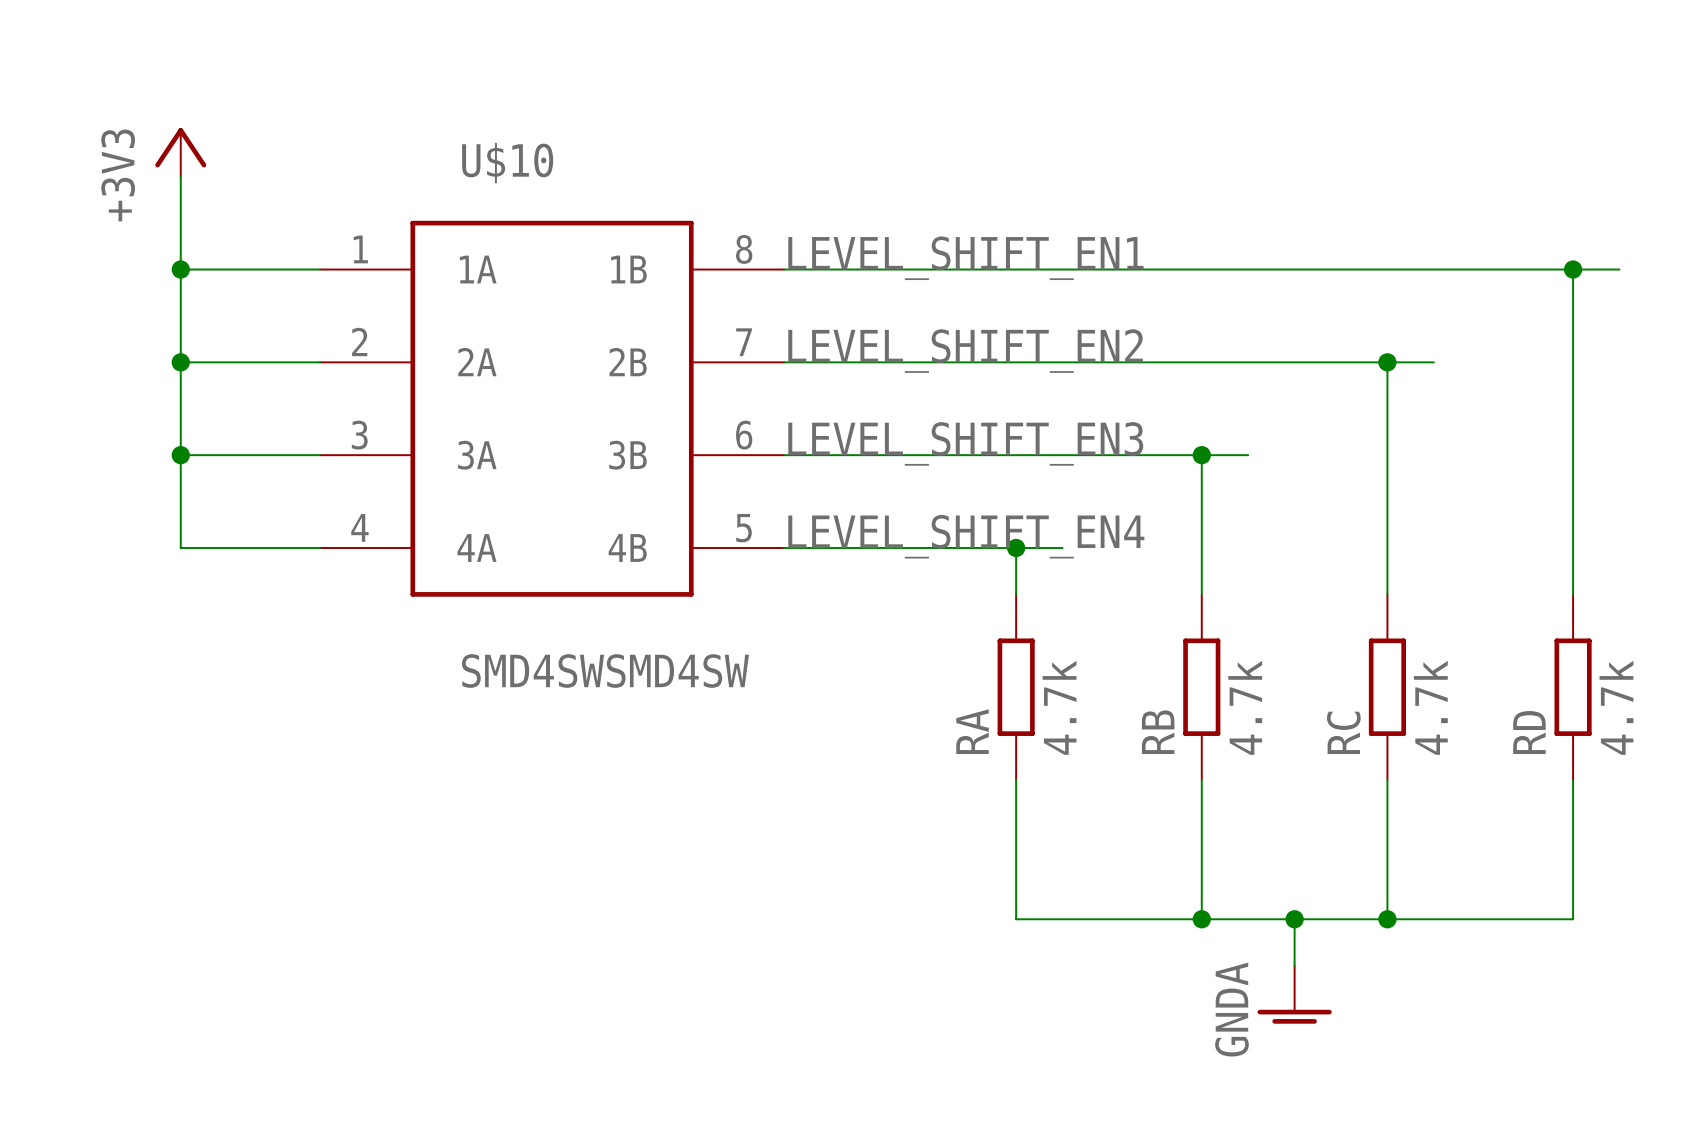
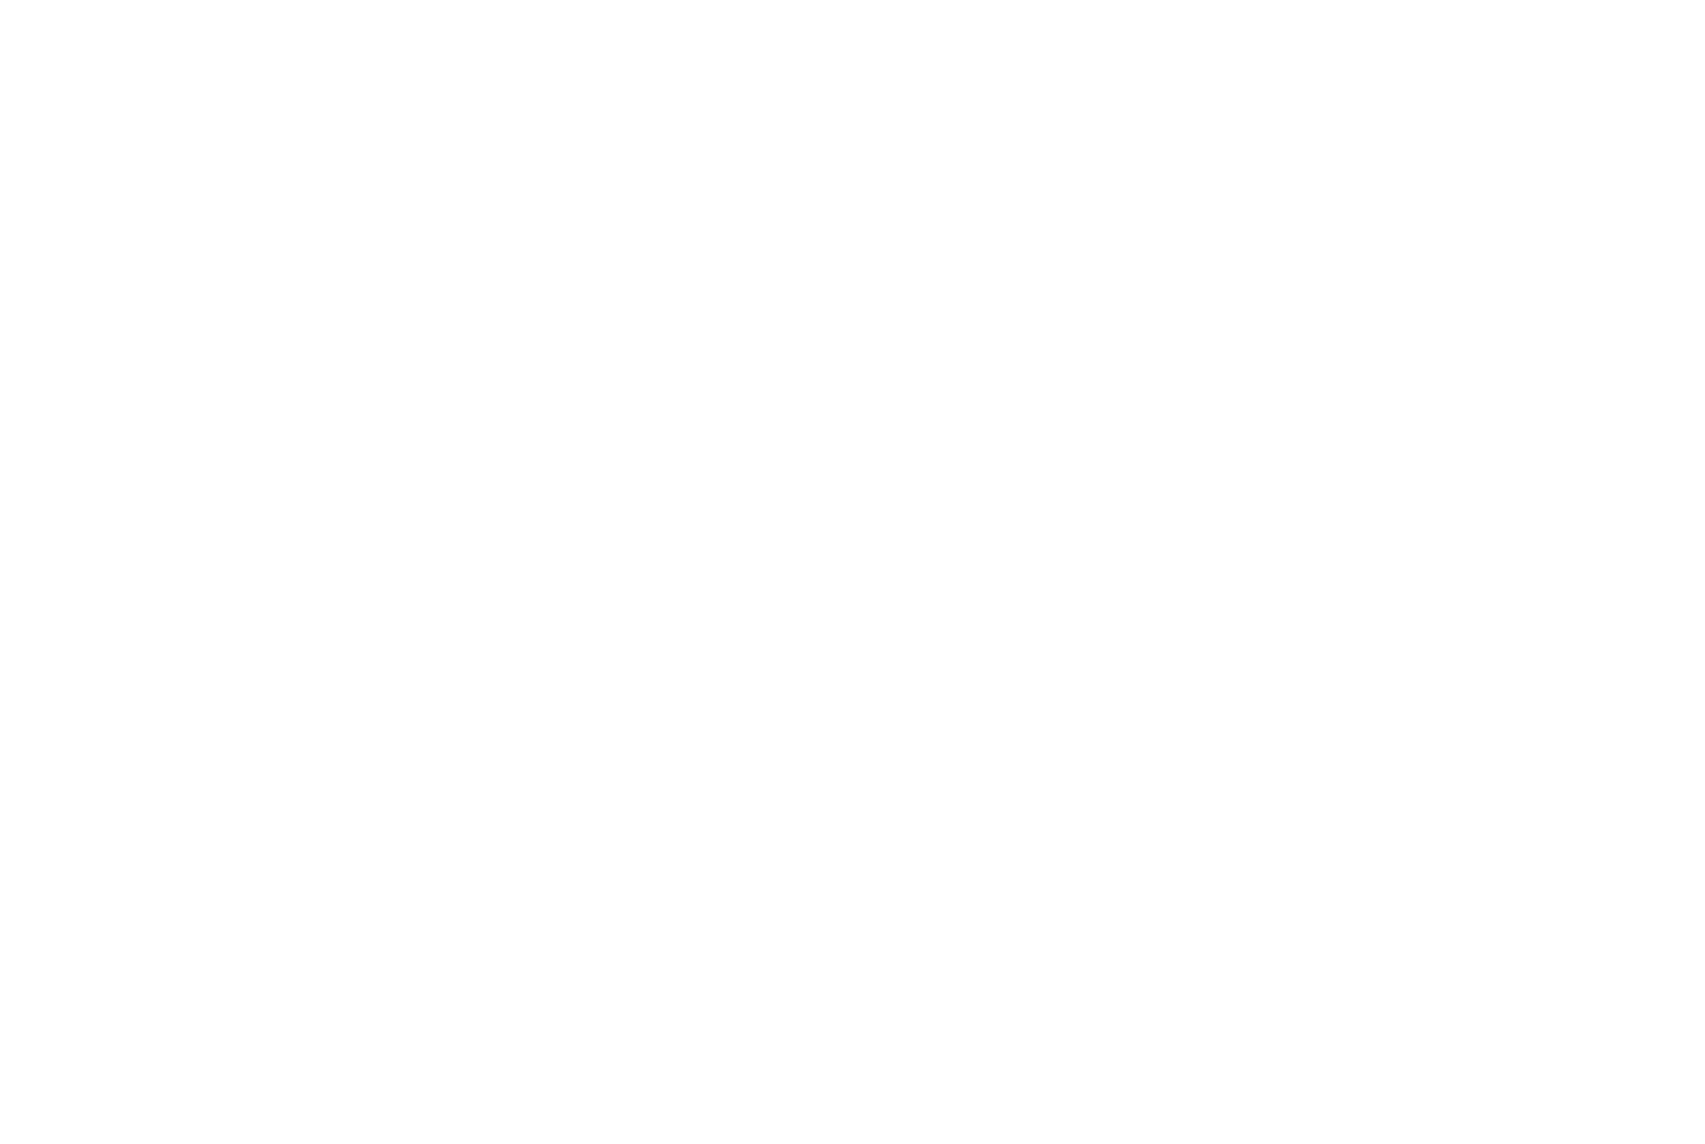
power symbol: +3V3 (180, 152) -> none
wire: (180, 176) (180, 547) (319, 547) -> none
label: LEVEL_SHIFT_EN1 (965, 258) -> none
wire: (180, 269) (319, 269) -> none
junction: (180, 269) -> none
wire: (784, 269) (1619, 269) -> none
wire: (1573, 269) (1573, 594) -> none
junction: (1573, 269) -> none
label: LEVEL_SHIFT_EN2 (965, 351) -> none
wire: (180, 362) (319, 362) -> none
junction: (180, 362) -> none
wire: (784, 362) (1433, 362) -> none
wire: (1387, 362) (1387, 594) -> none
junction: (1387, 362) -> none
U$10: SMD4SWSMD4SW (552, 408) -> none
label: LEVEL_SHIFT_EN3 (965, 443) -> none
wire: (180, 455) (319, 455) -> none
junction: (180, 455) -> none
wire: (784, 455) (1248, 455) -> none
wire: (1201, 455) (1201, 594) -> none
junction: (1201, 455) -> none
label: LEVEL_SHIFT_EN4 (966, 536) -> none
wire: (784, 547) (1062, 547) -> none
wire: (1016, 547) (1016, 594) -> none
junction: (1016, 547) -> none
RA: 4.7k (1016, 687) -> none
RB: 4.7k (1201, 687) -> none
RC: 4.7k (1387, 687) -> none
RD: 4.7k (1573, 687) -> none
wire: (1016, 780) (1016, 919) (1573, 919) (1573, 780) -> none
wire: (1201, 780) (1201, 919) -> none
wire: (1387, 780) (1387, 919) -> none
junction: (1201, 919) -> none
wire: (1294, 919) (1294, 965) -> none
junction: (1294, 919) -> none
junction: (1387, 919) -> none
power symbol: GNDA (1294, 994) -> none

